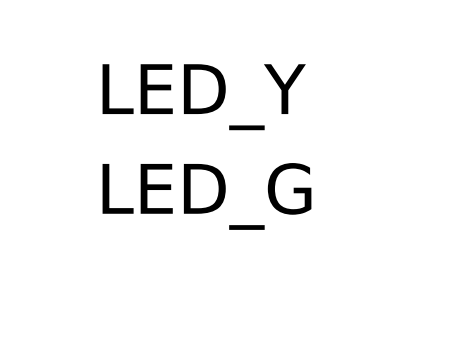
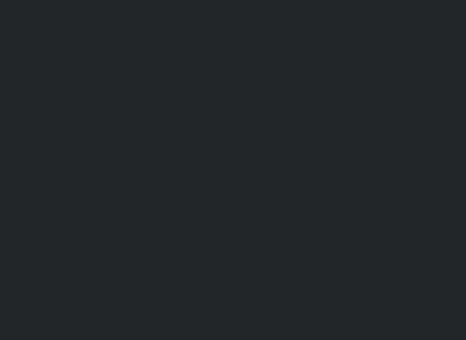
label: LED_Y (204, 97) -> none
label: LED_G (206, 196) -> none

